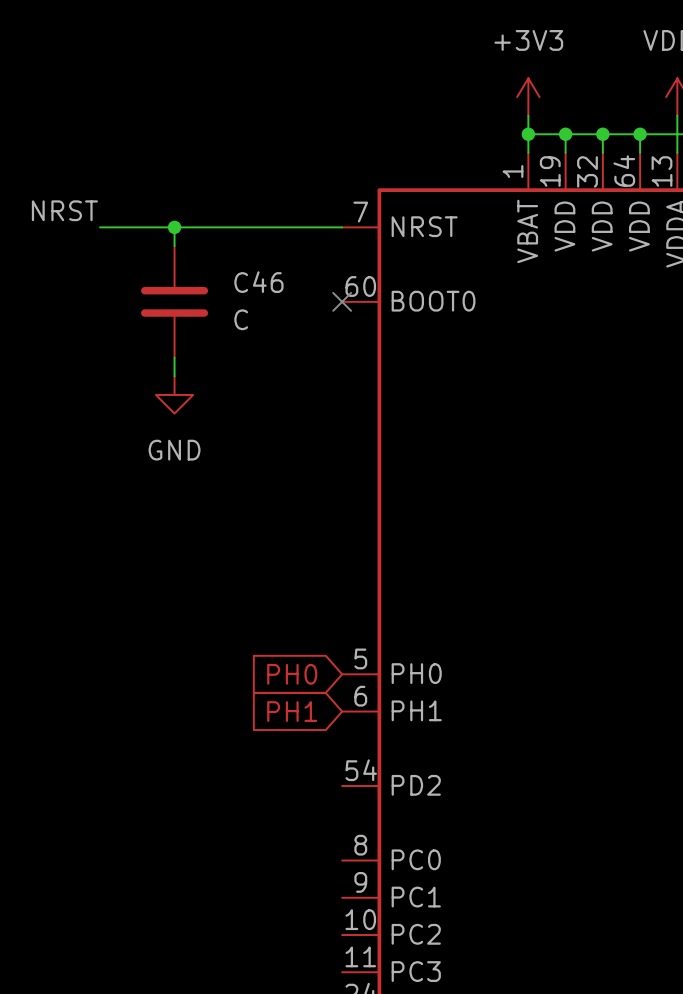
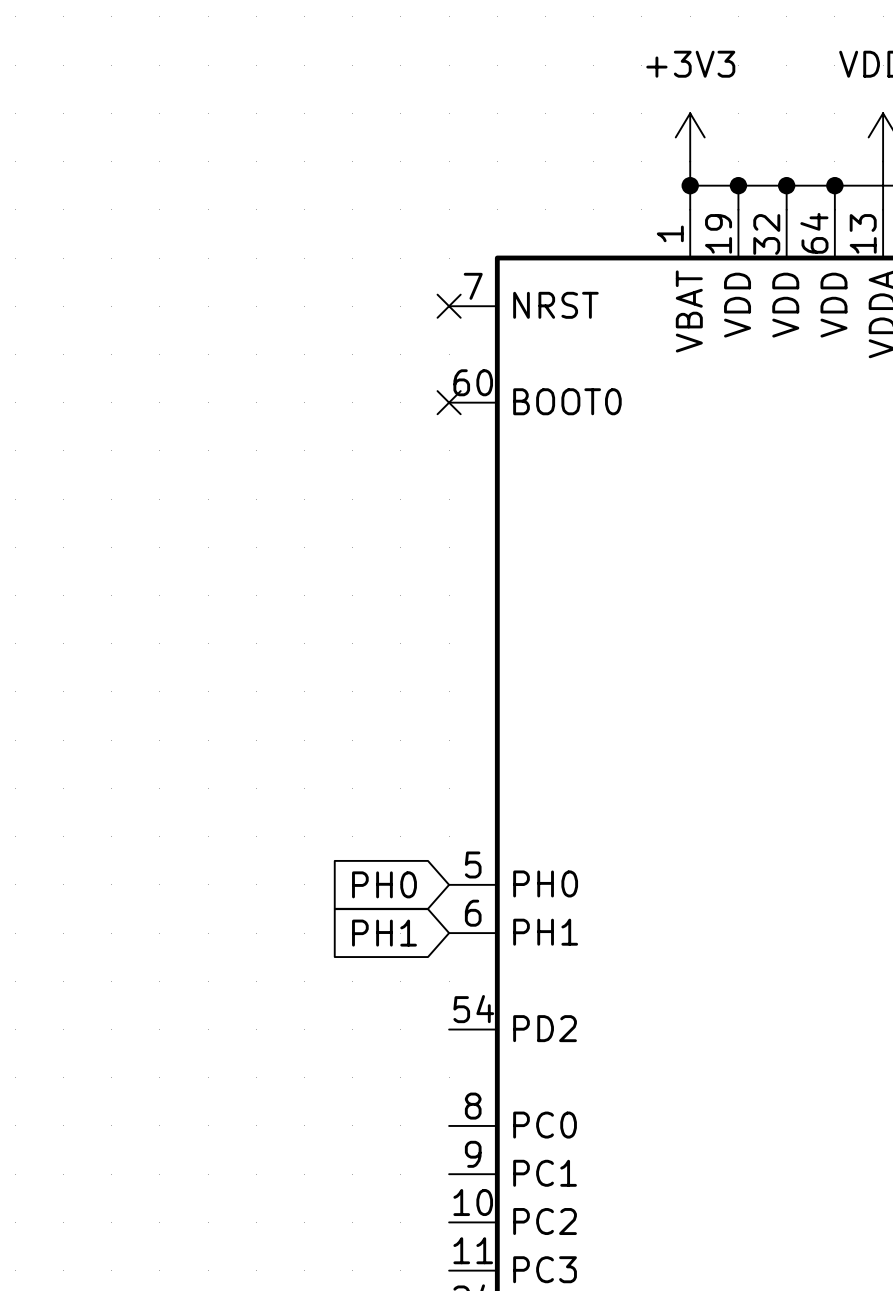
label: NRST (64, 210) -> none
wire: (100, 227) (342, 227) -> none
wire: (174, 227) (174, 245) -> none
junction: (174, 227) -> none
no-connect mark: none -> (449, 306)
C46: C (174, 301) -> none
wire: (174, 357) (174, 376) -> none
power symbol: GND (174, 394) -> none

